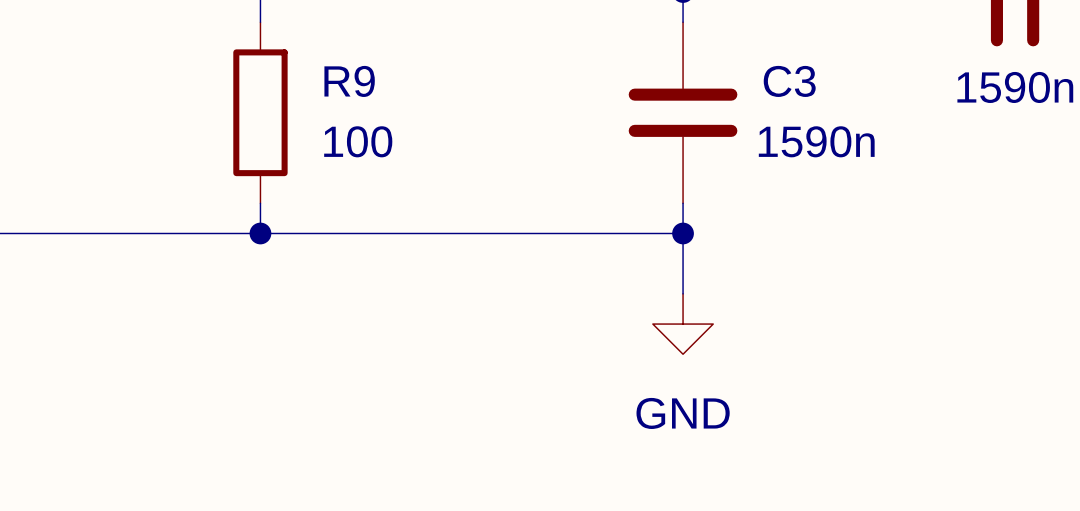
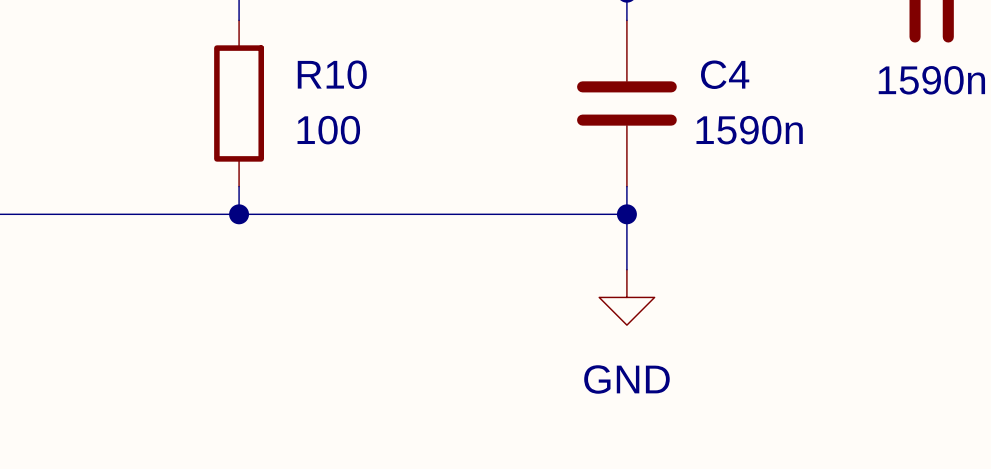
R9 name: R9 (349, 81) -> R10 (332, 74)
C3 name: C3 (789, 81) -> C4 (725, 74)

